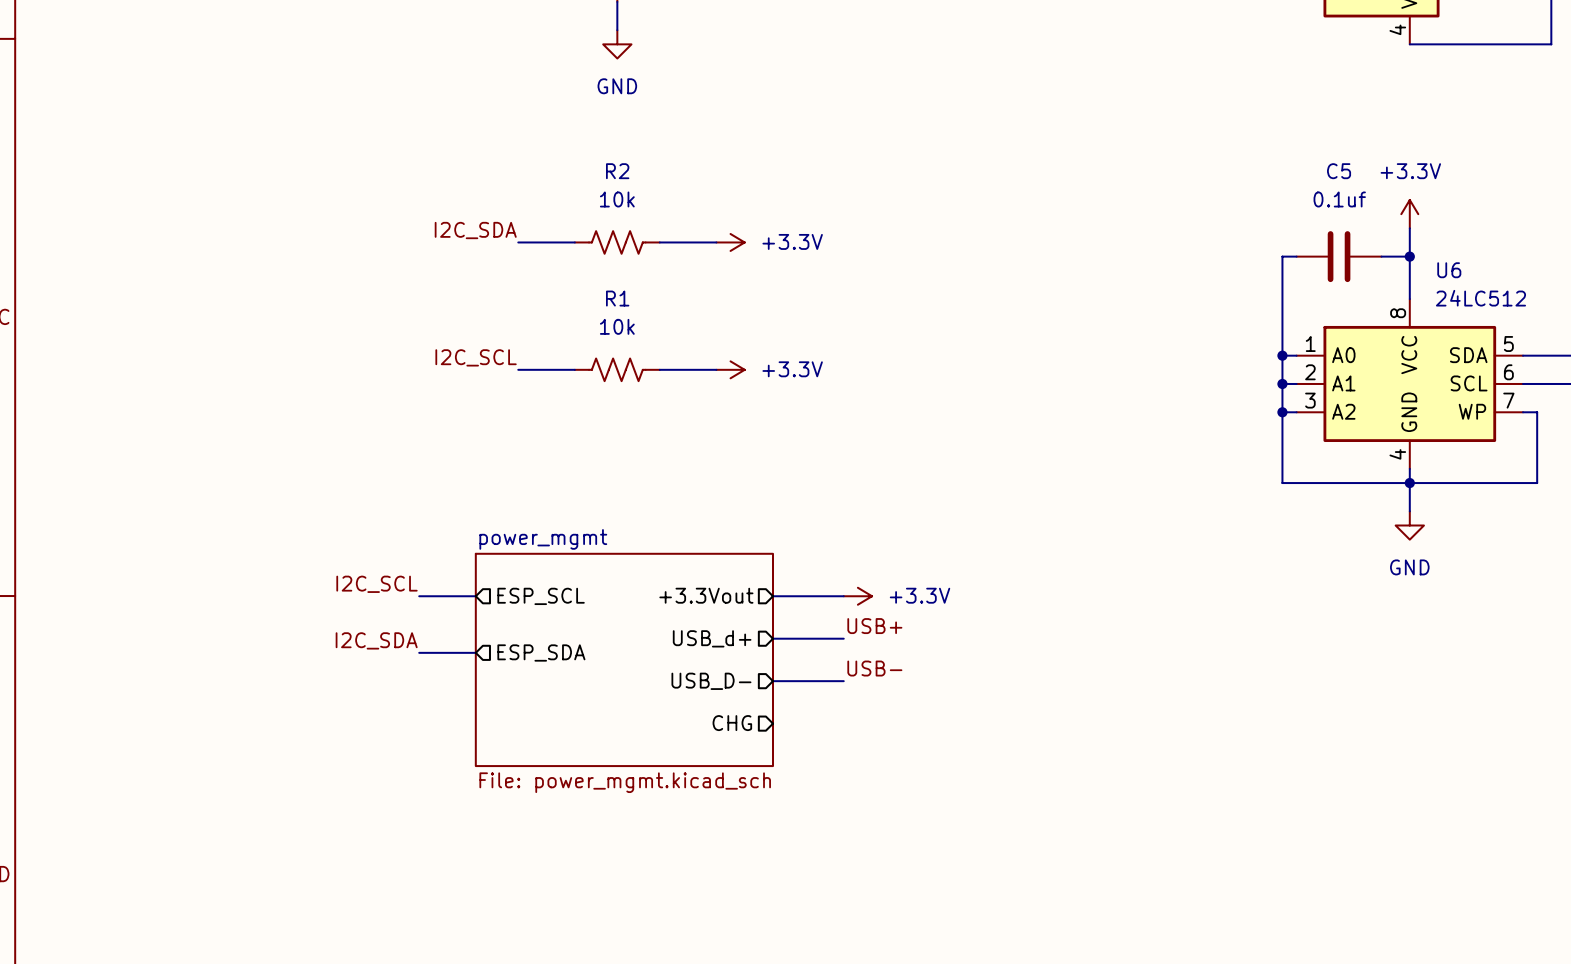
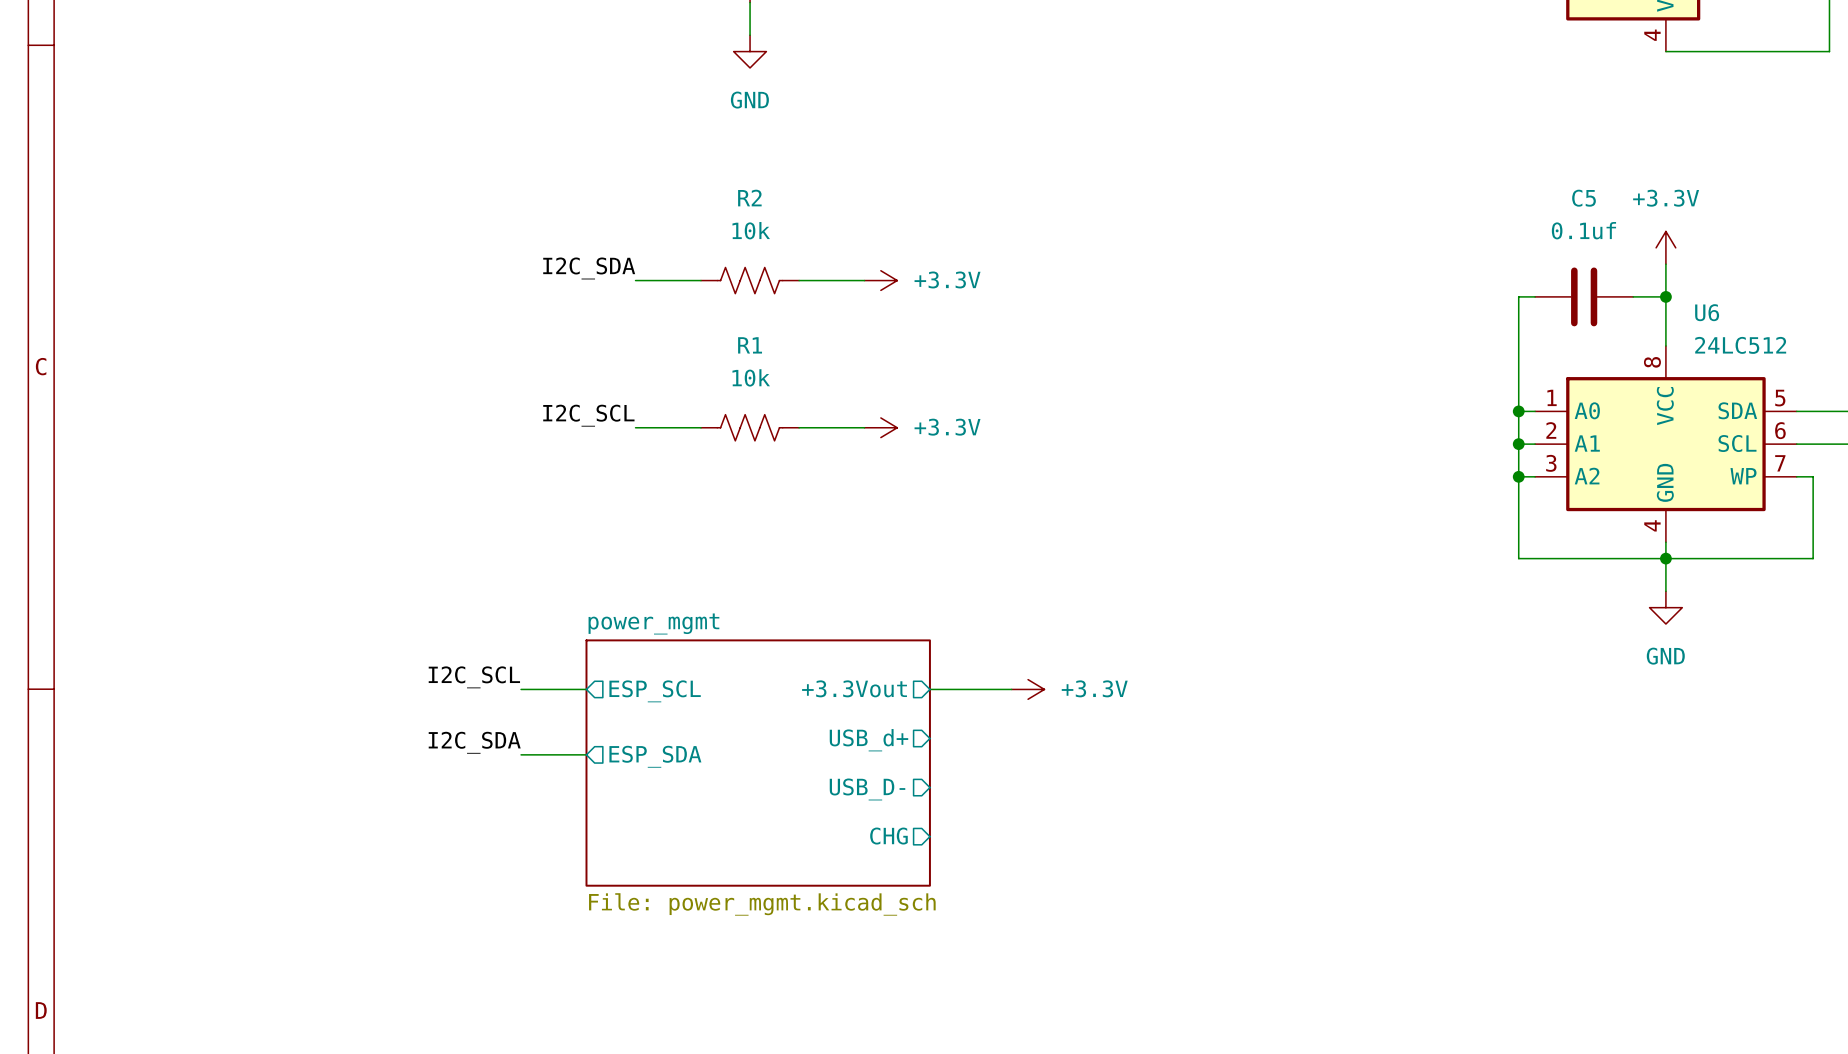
label: USB+ (874, 626) -> none
wire: (773, 638) (843, 638) -> none
label: USB- (874, 668) -> none
wire: (773, 681) (843, 681) -> none

